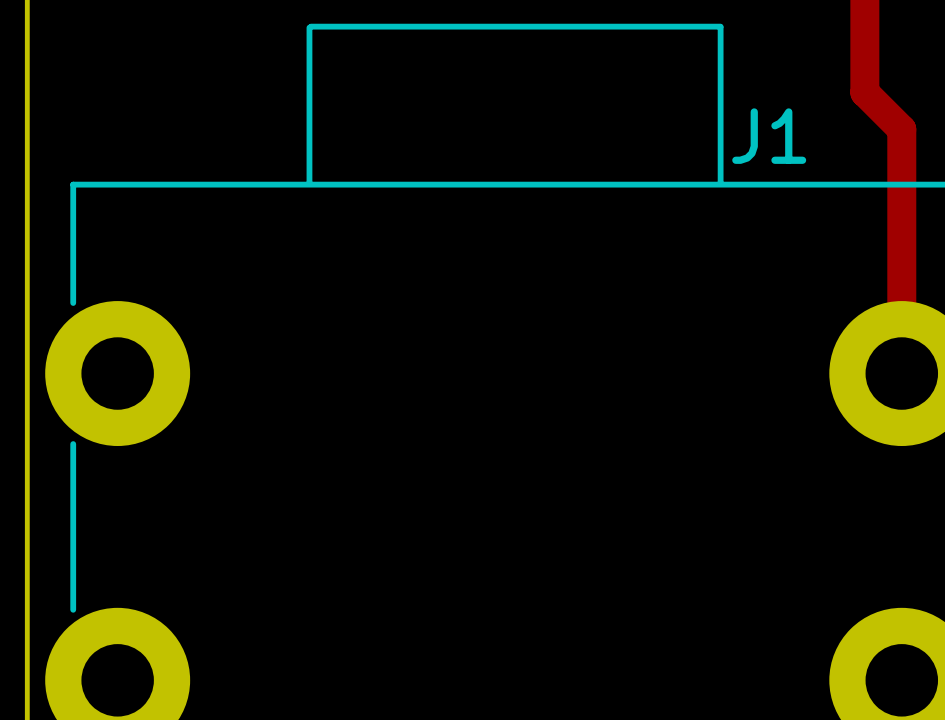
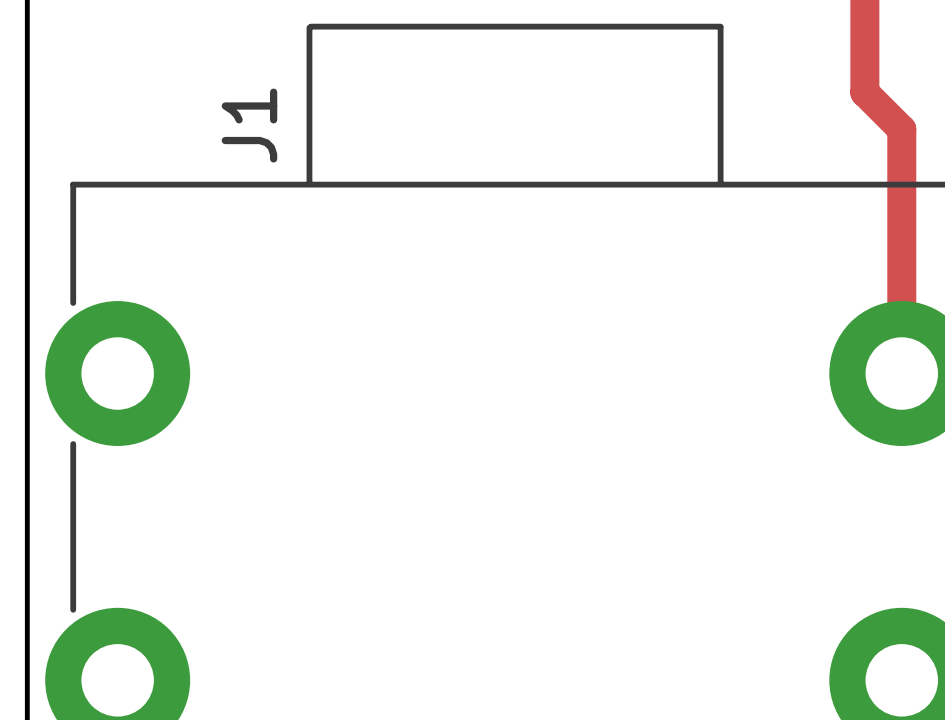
J1 name rotation: 0° (769, 136) -> 90° counterclockwise (249, 125)
J1 name position: J1 (769, 136) -> J1 (249, 125)

